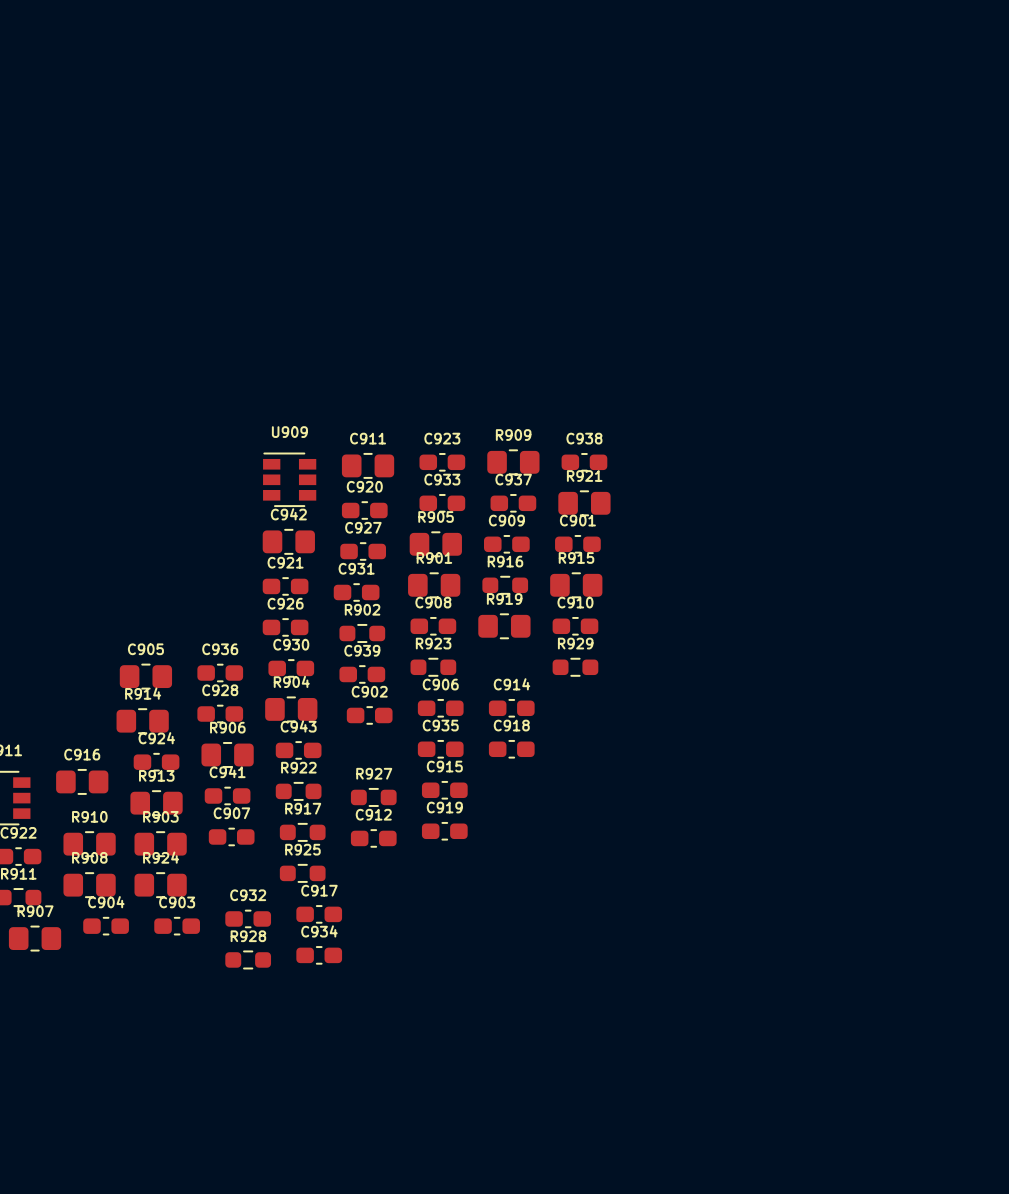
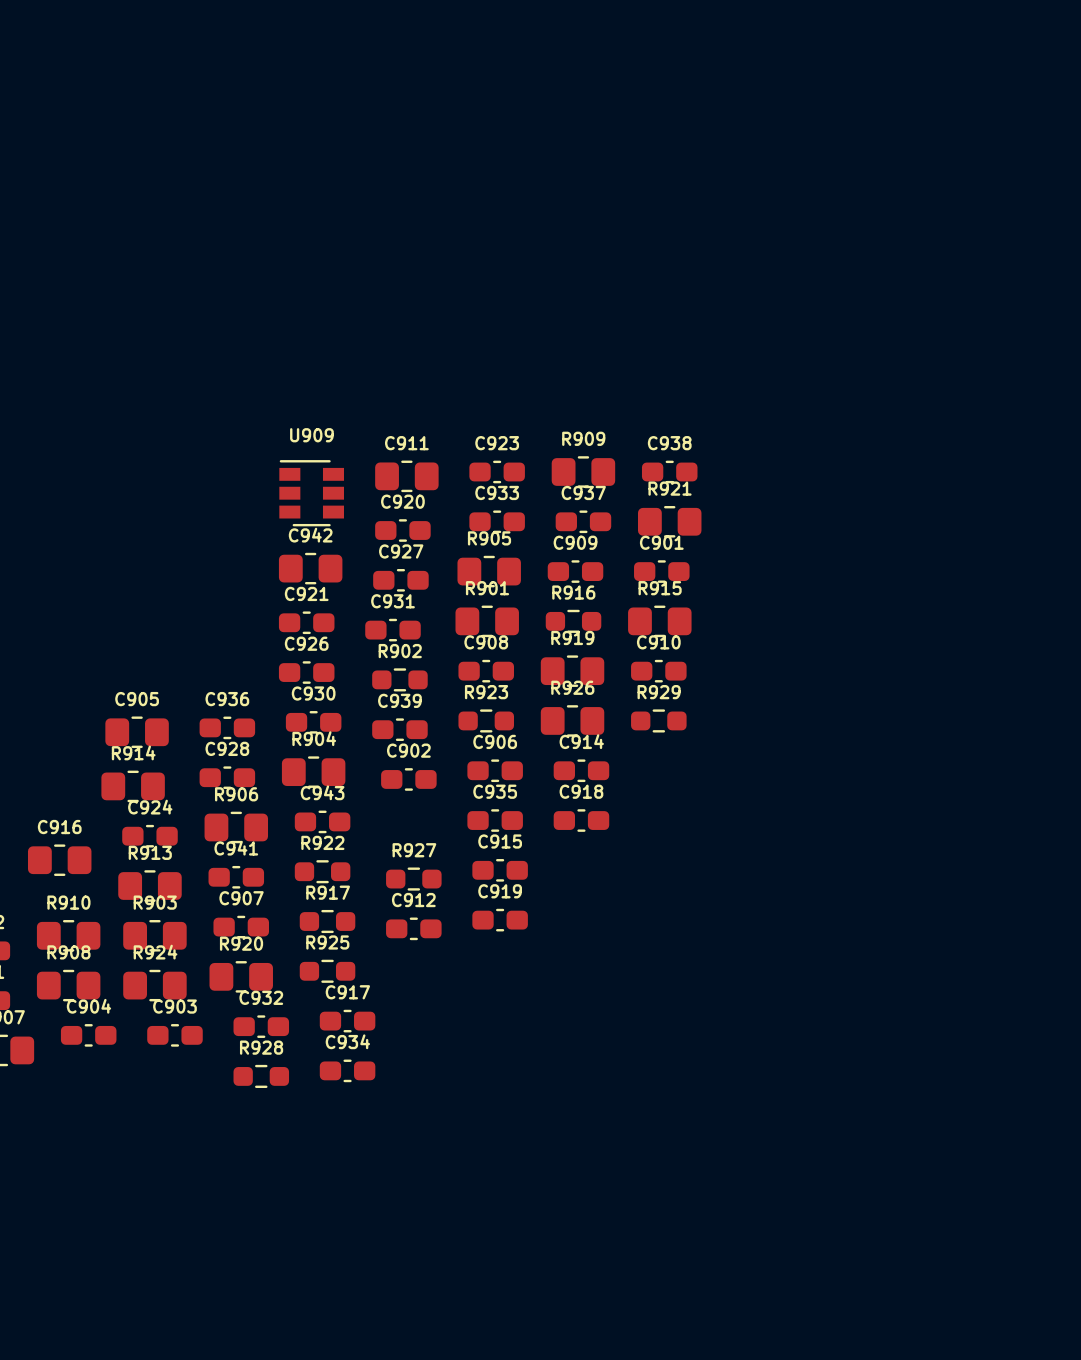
R926: none -> (572, 720)
R920: none -> (241, 976)

